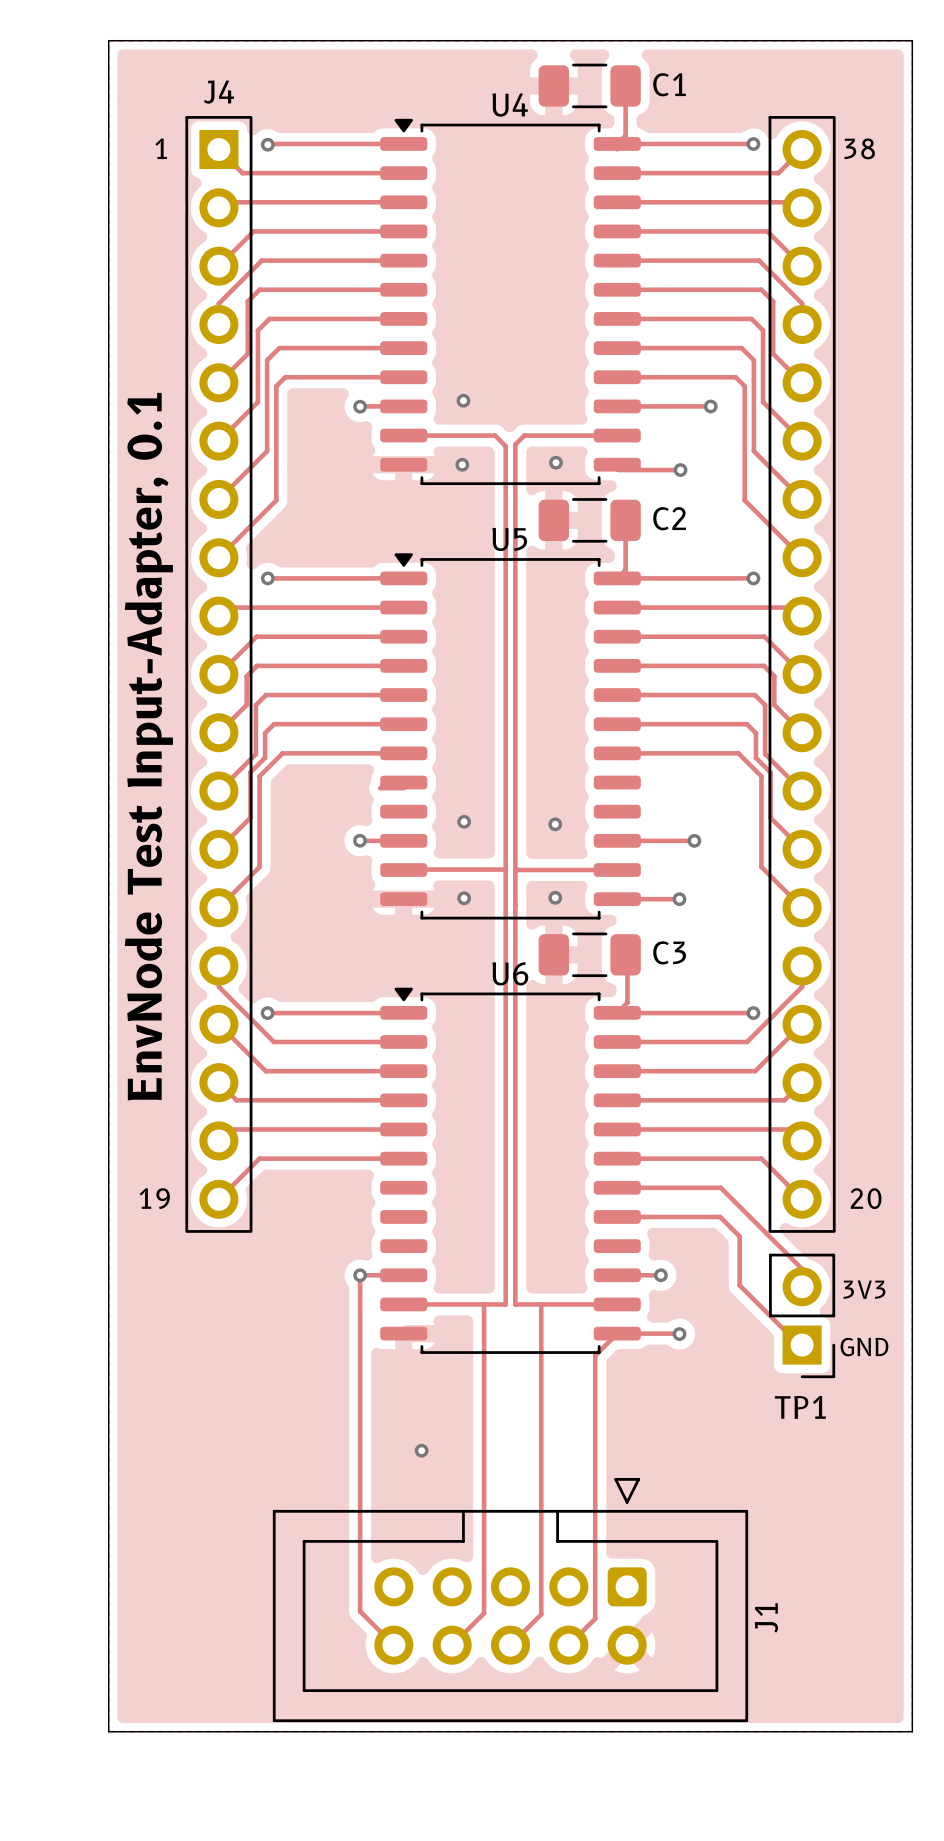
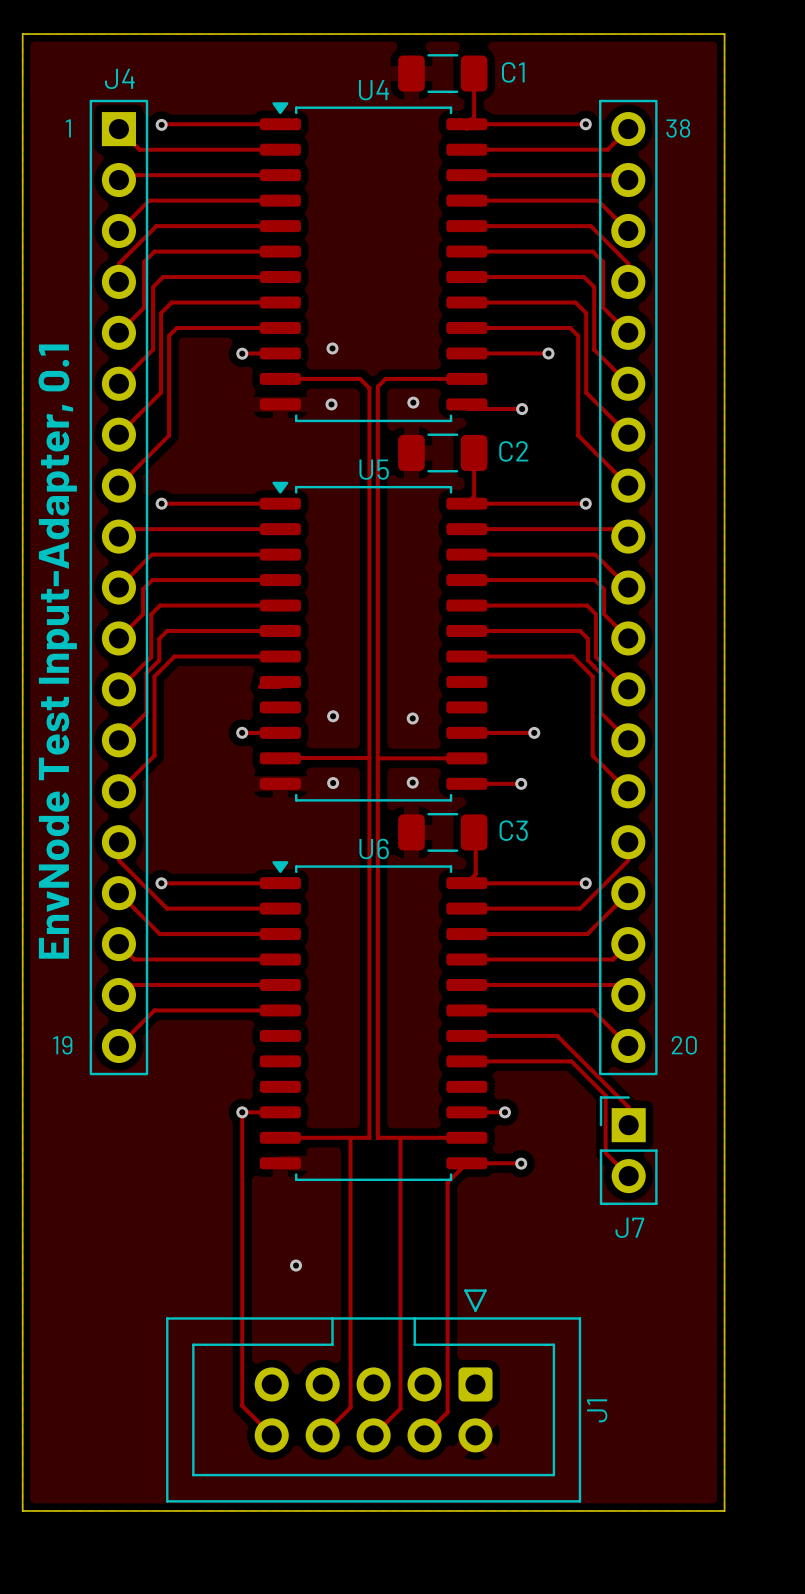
track: (720, 1216) (739, 1236) (739, 1285) (776, 1321) -> (556, 1061) (571, 1061) (605, 1095) (605, 1153)
text: 3V3 (864, 1289) -> none
TP1: (802, 1315) -> none
J7: none -> (628, 1150)
text: GND (864, 1347) -> none

